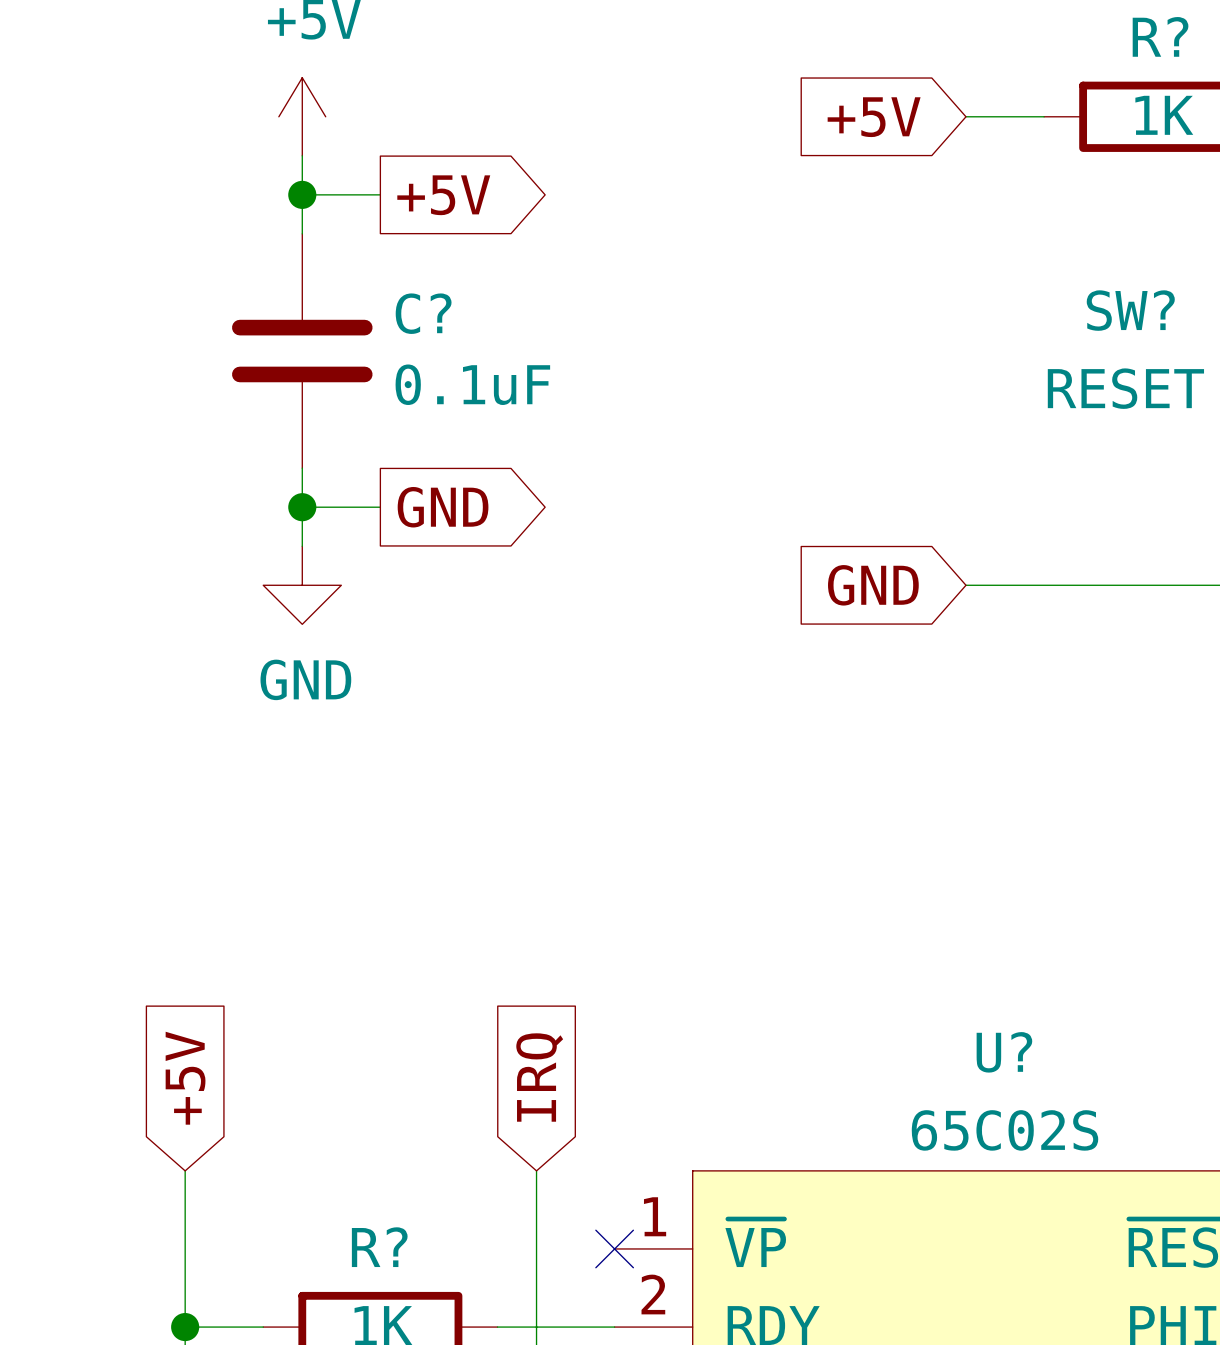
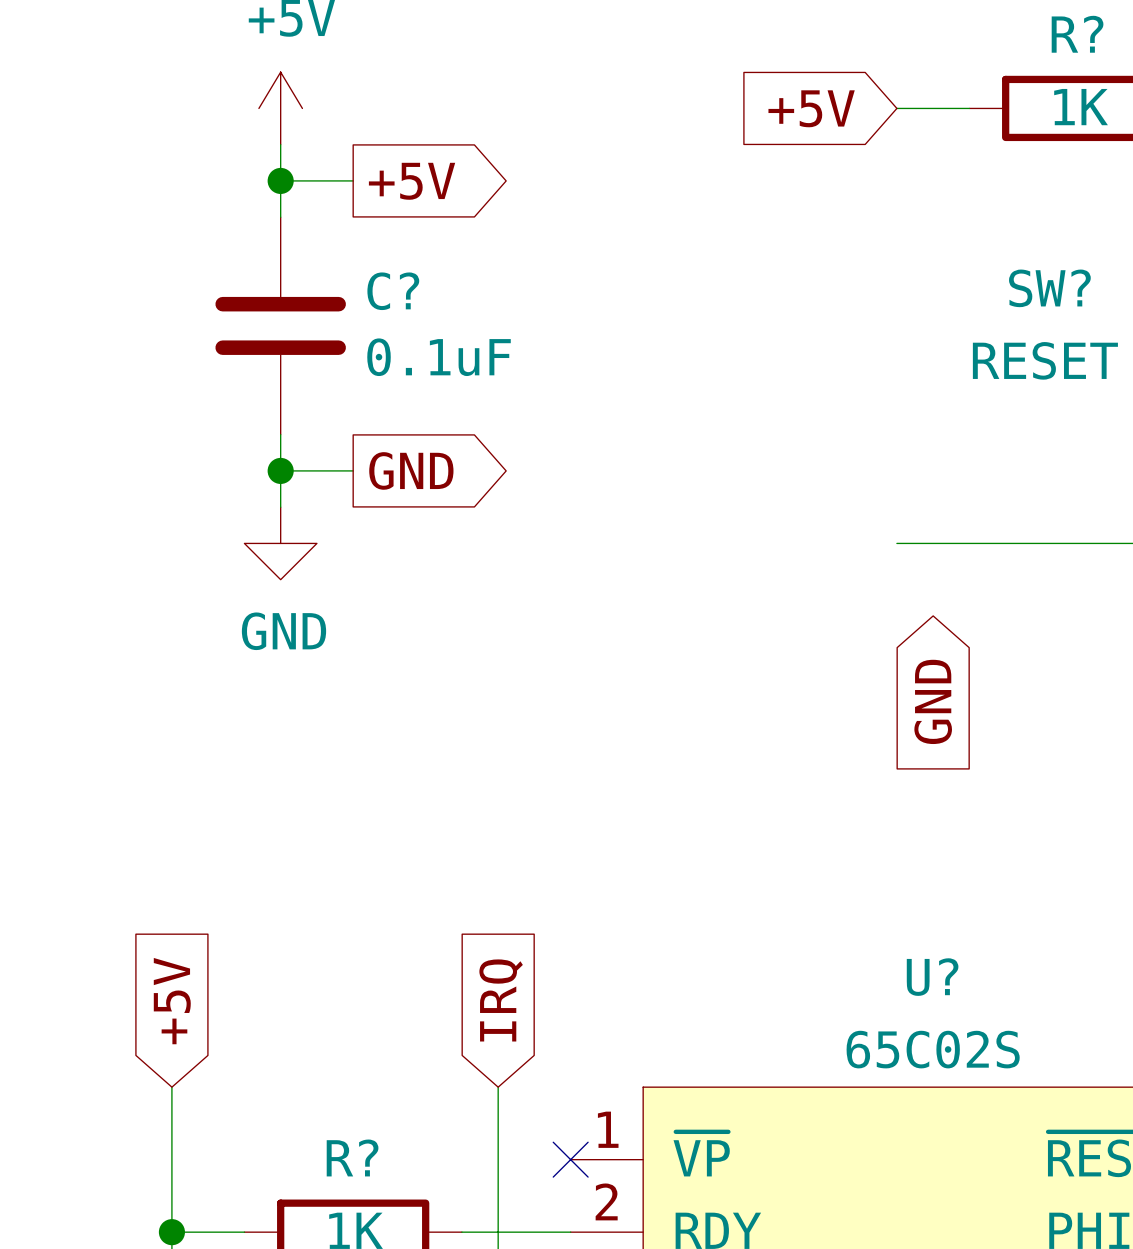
global label rotation: 0° (873, 585) -> 90° counterclockwise (933, 701)
global label position: GND (873, 585) -> GND (933, 701)

